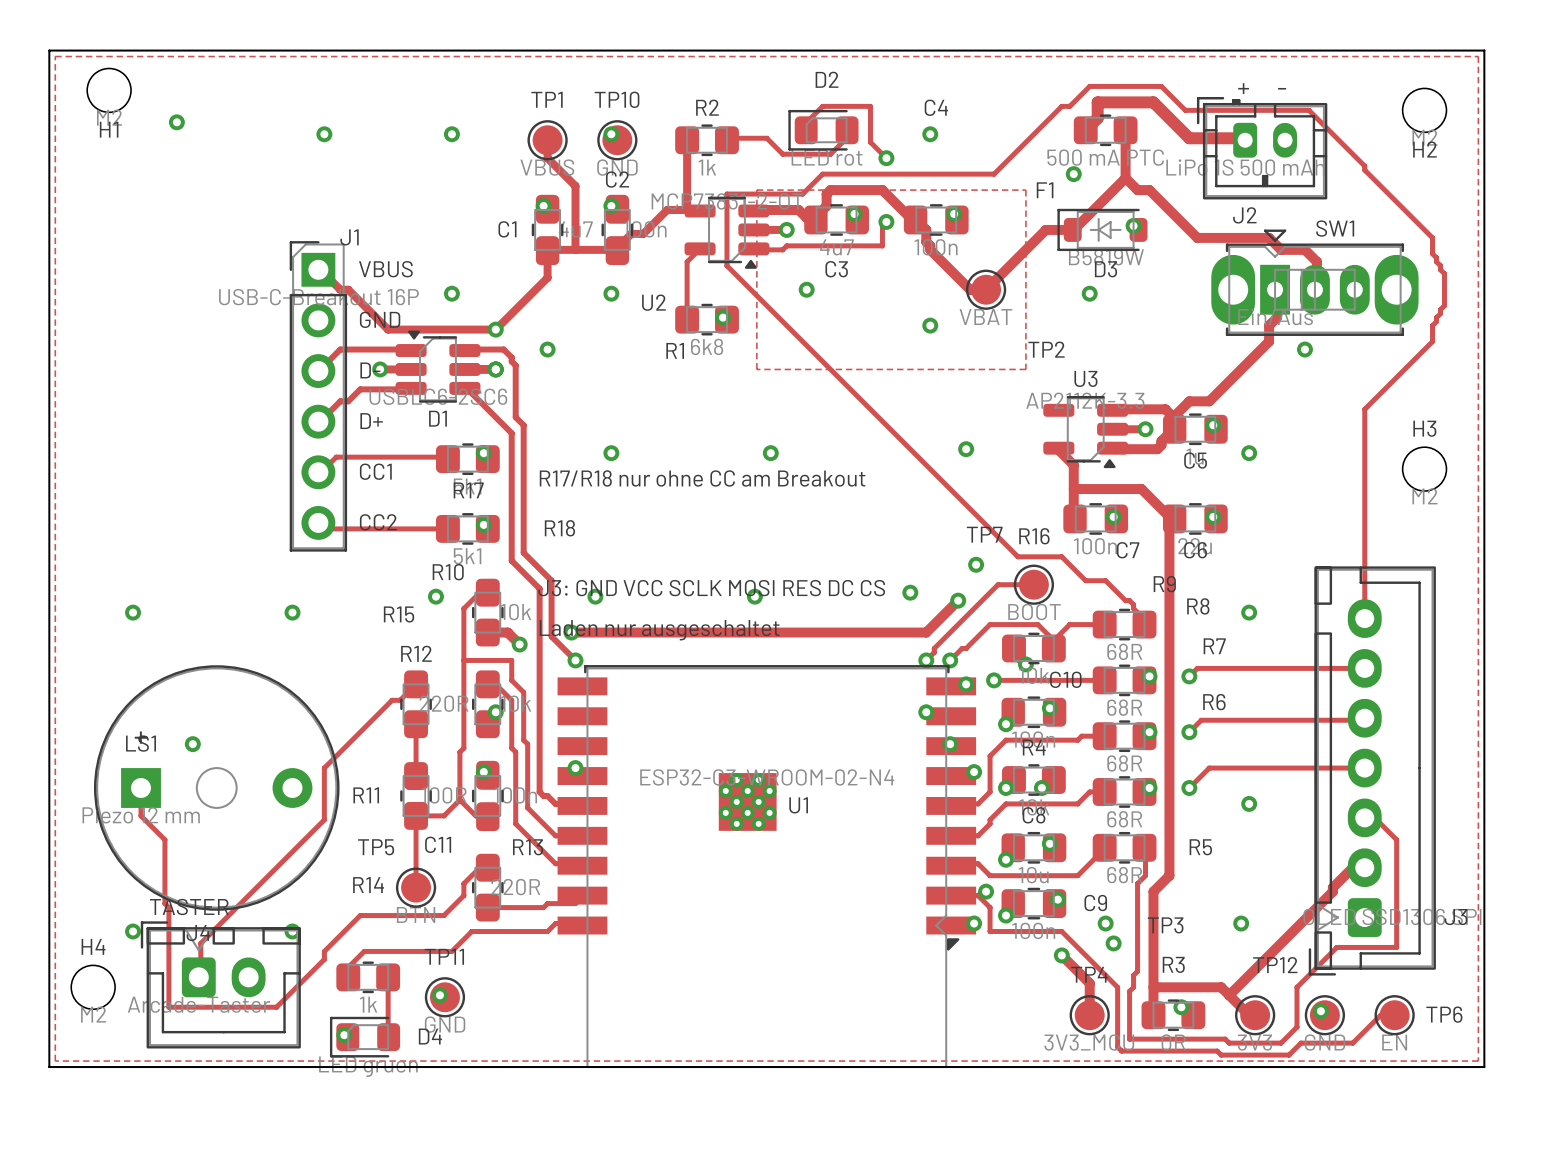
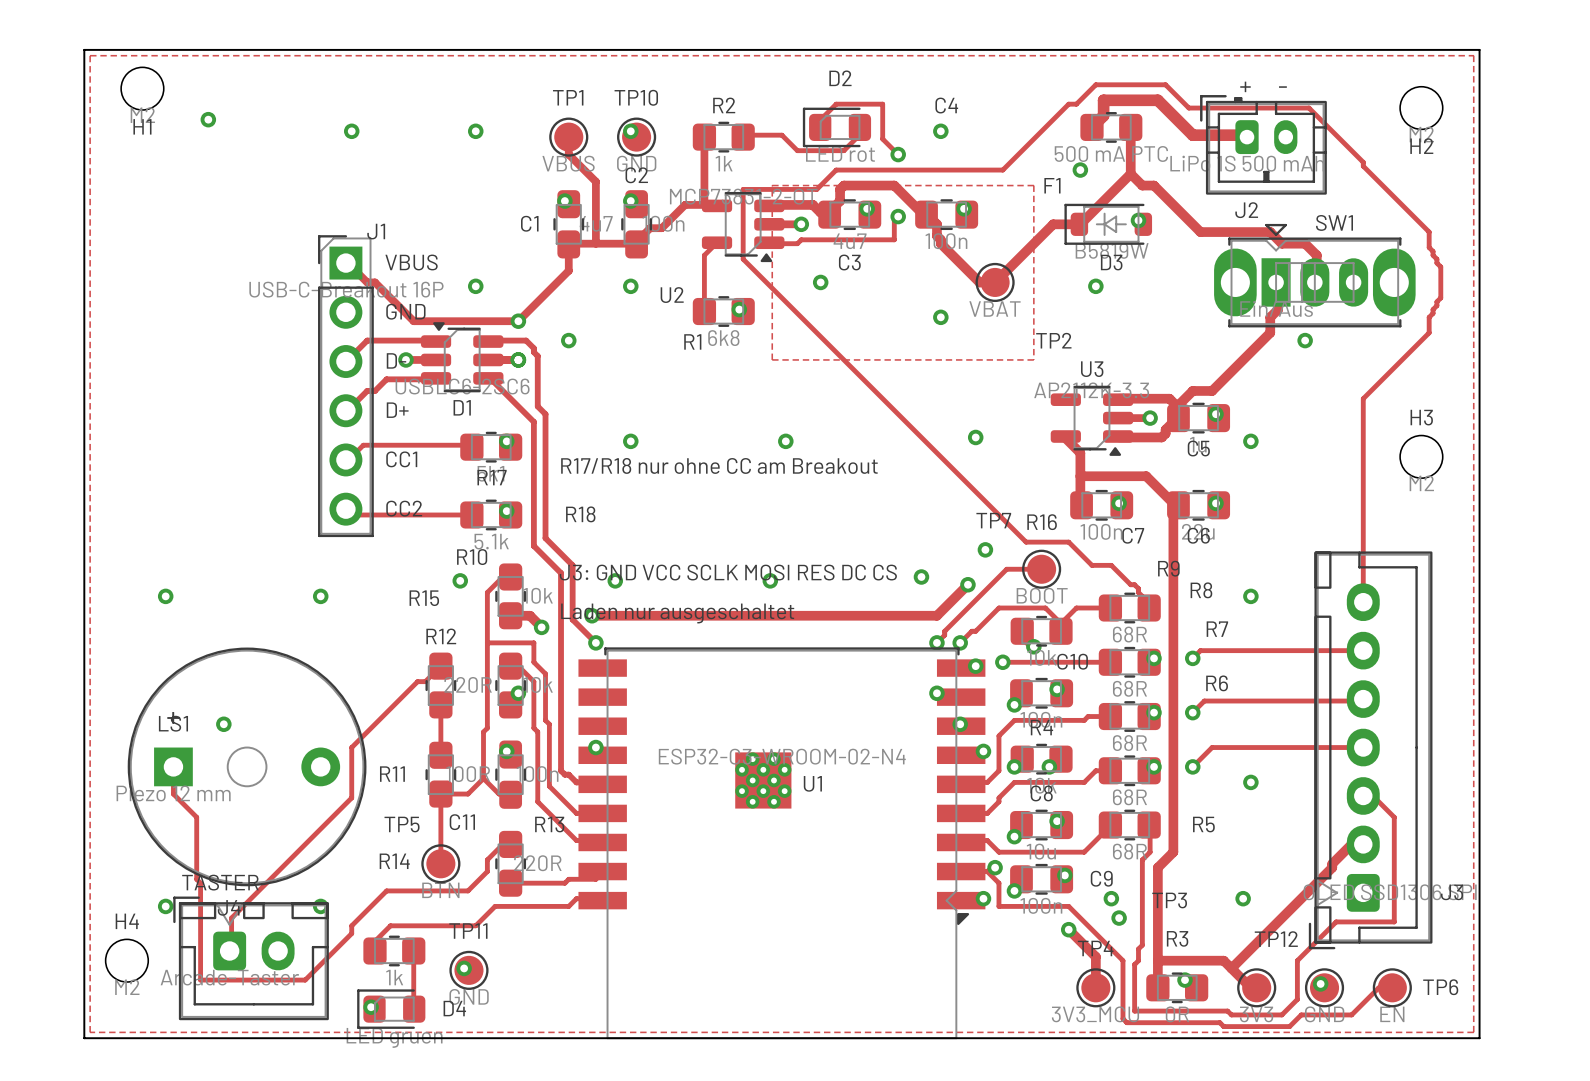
R18 value: 5k1 (467, 556) -> 5.1k (491, 541)

